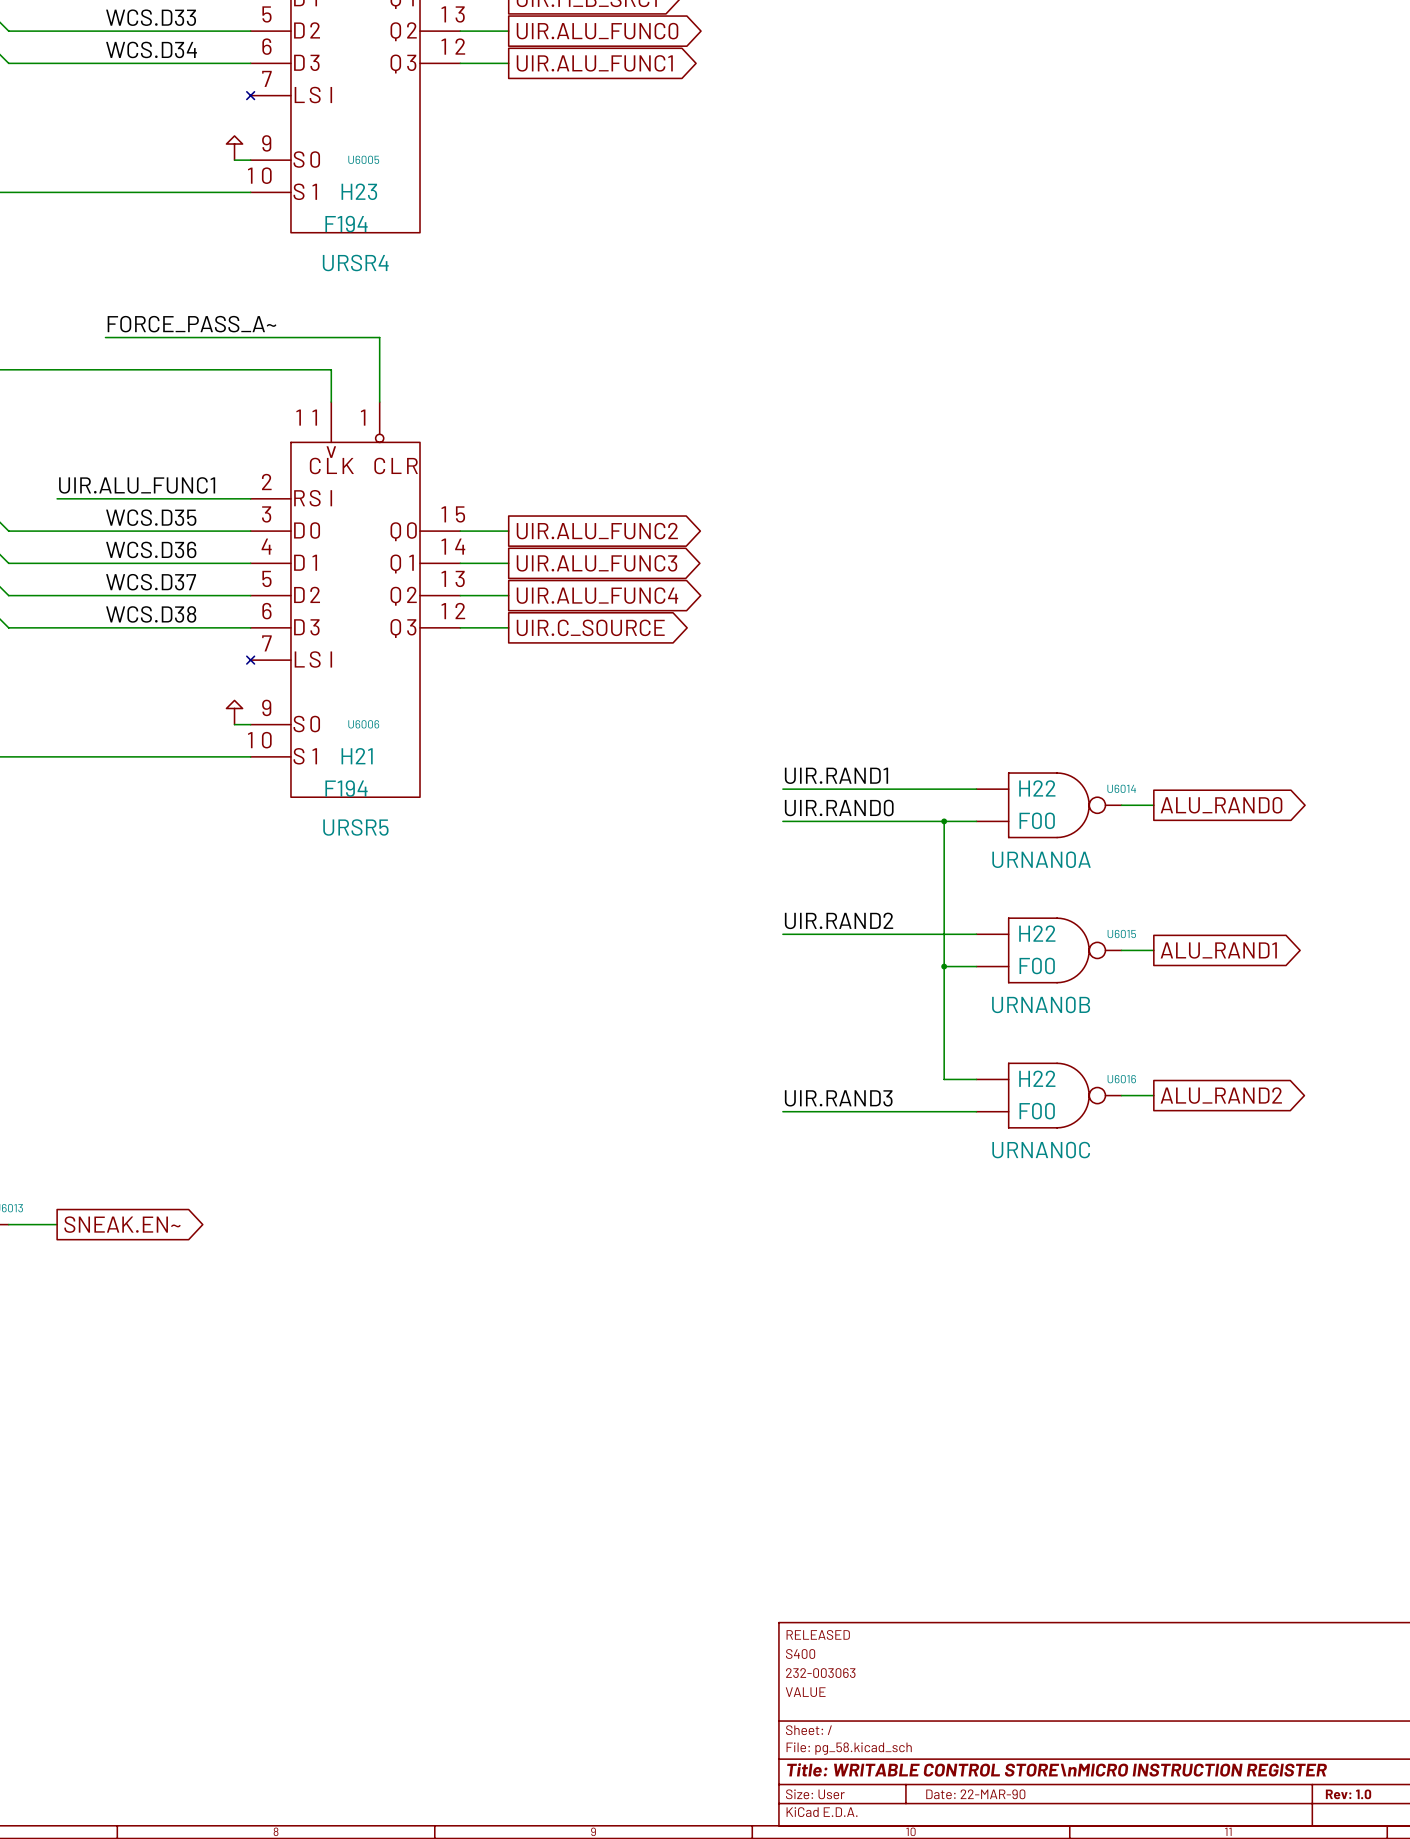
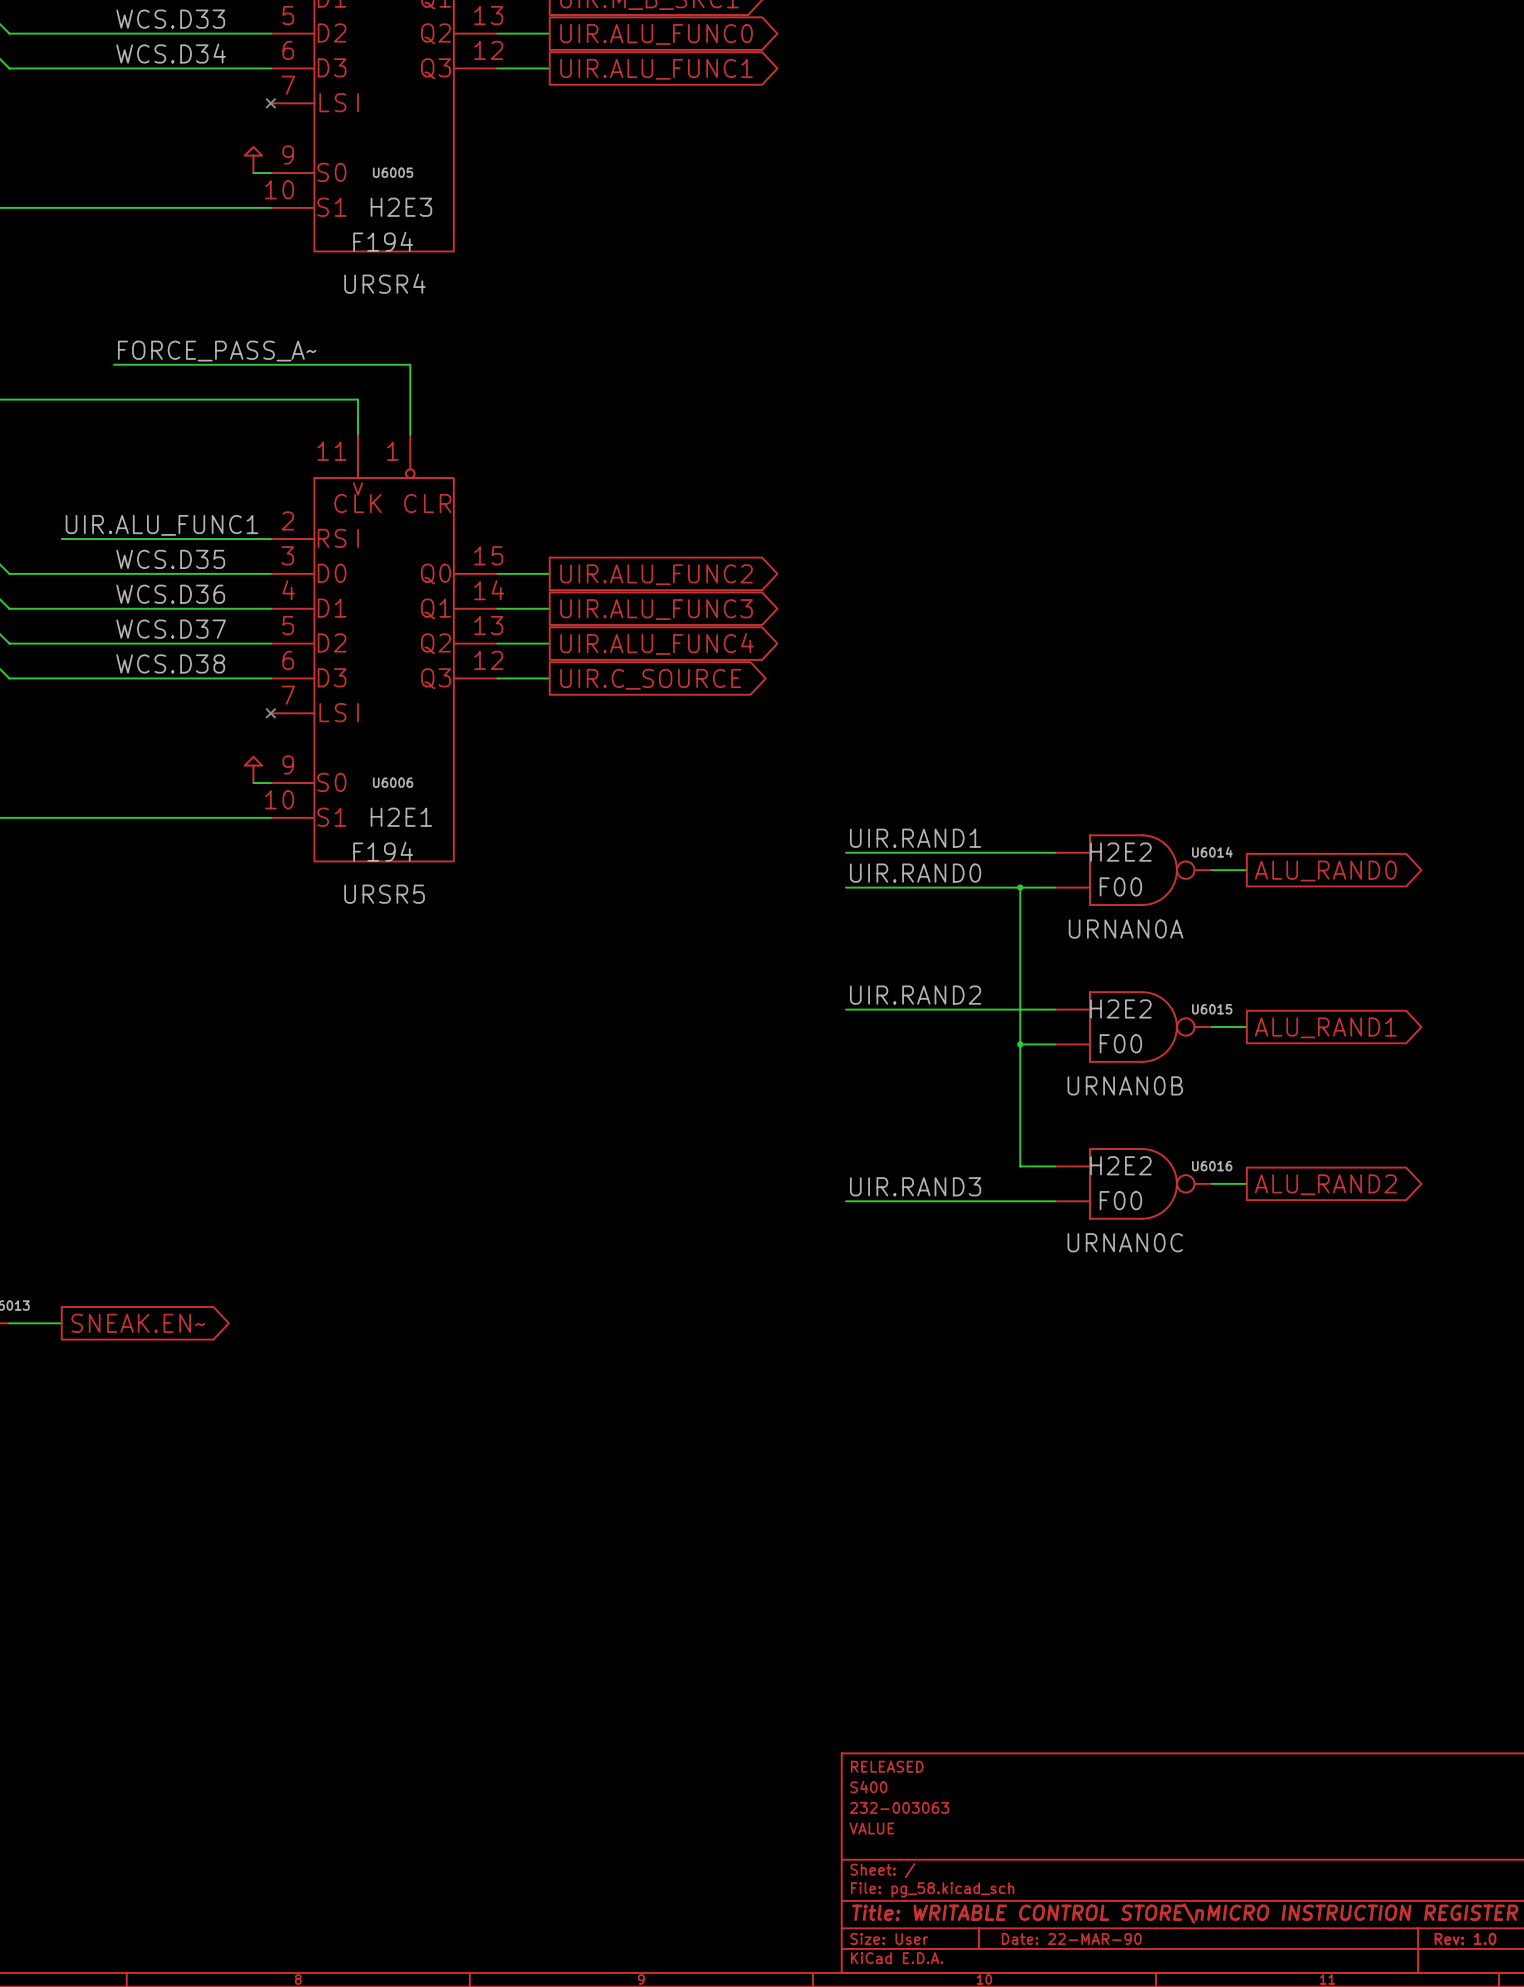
U6005 text: H23 (359, 191) -> H2E3 (401, 207)
U6006 text: H21 (357, 756) -> H2E1 (401, 817)
U6014 text: H22 (1037, 788) -> H2E2 (1120, 852)
U6015 text: H22 (1037, 933) -> H2E2 (1120, 1008)
U6016 text: H22 (1037, 1078) -> H2E2 (1120, 1165)

